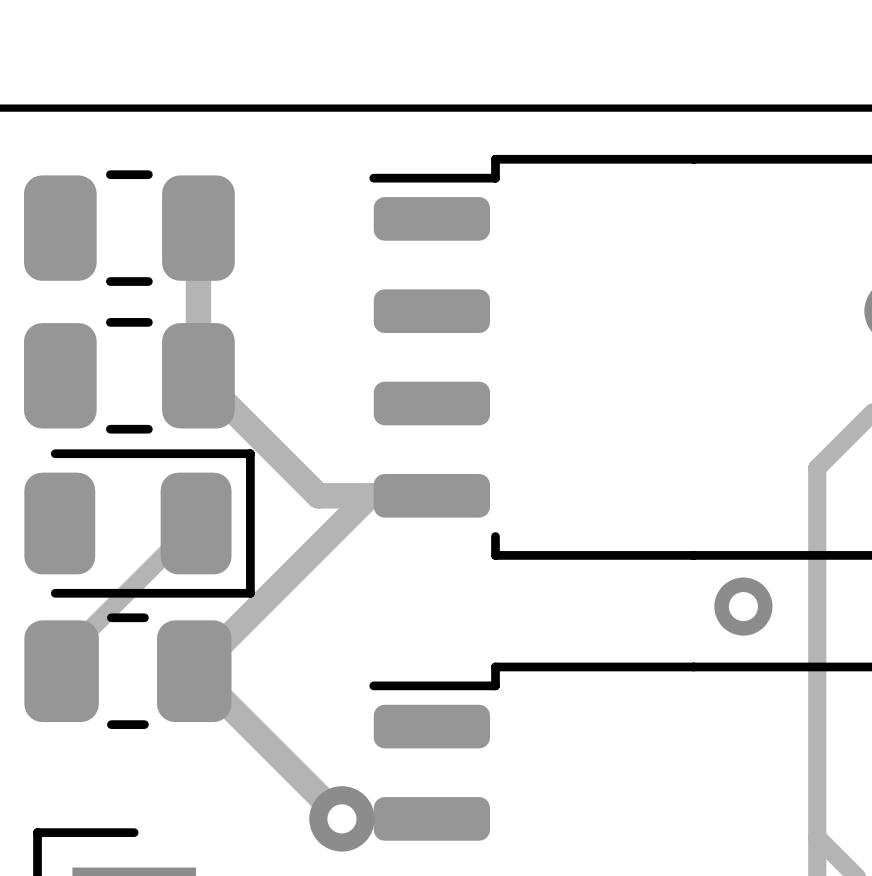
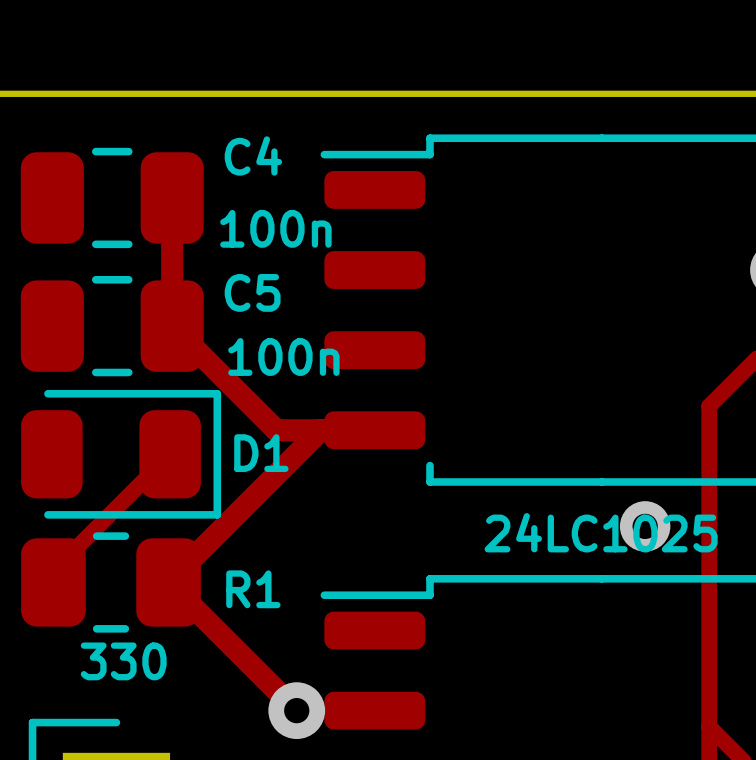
C4 name: none -> C4 (253, 155)
C4 value: none -> 100n (275, 228)
C5 name: none -> C5 (252, 292)
C5 value: none -> 100n (283, 356)
D1 name: none -> D1 (261, 453)
part value: none -> 24LC1025 (601, 532)
R1 name: none -> R1 (253, 589)
R1 value: none -> 330 (123, 661)

